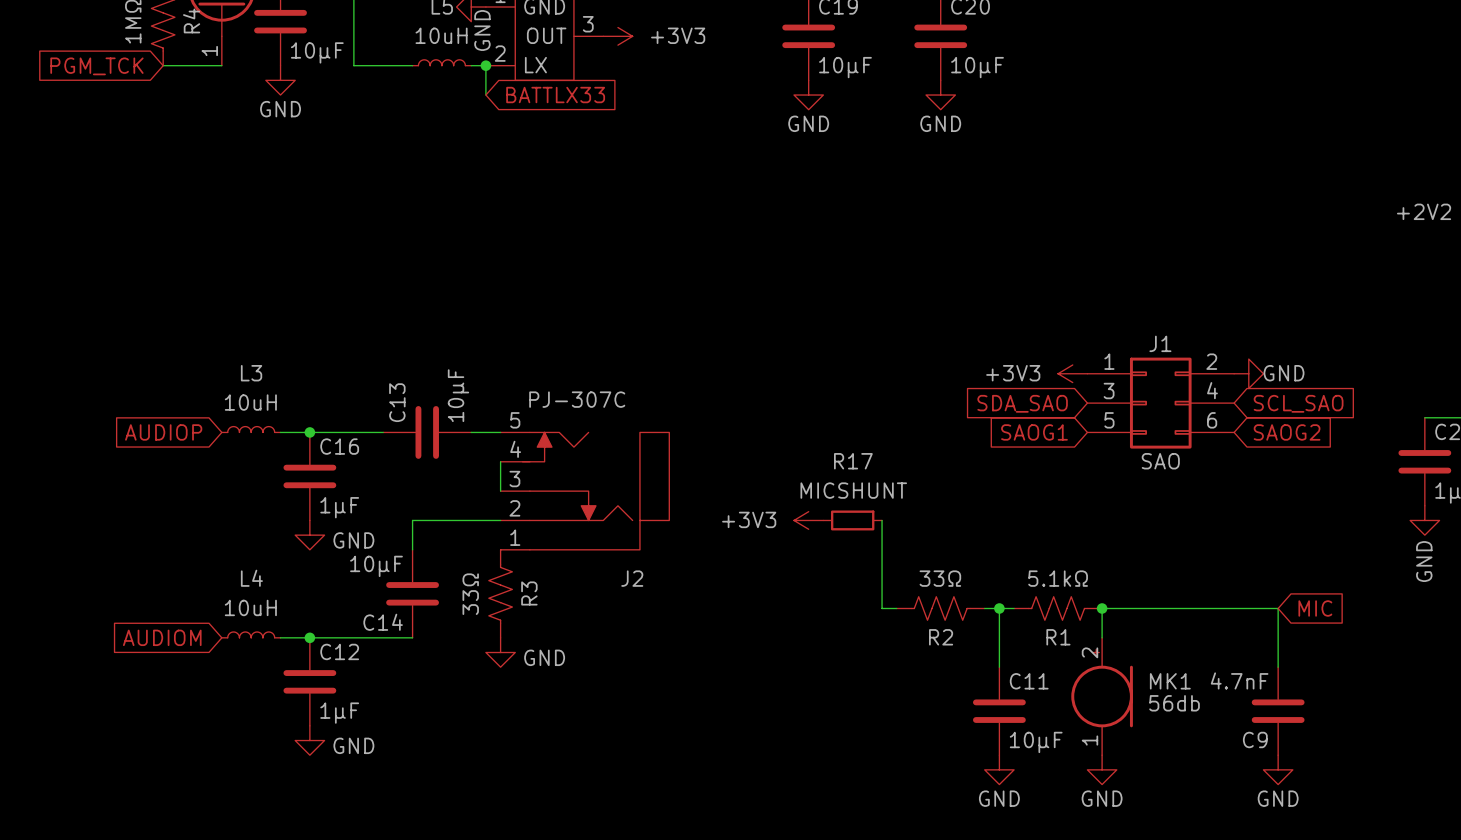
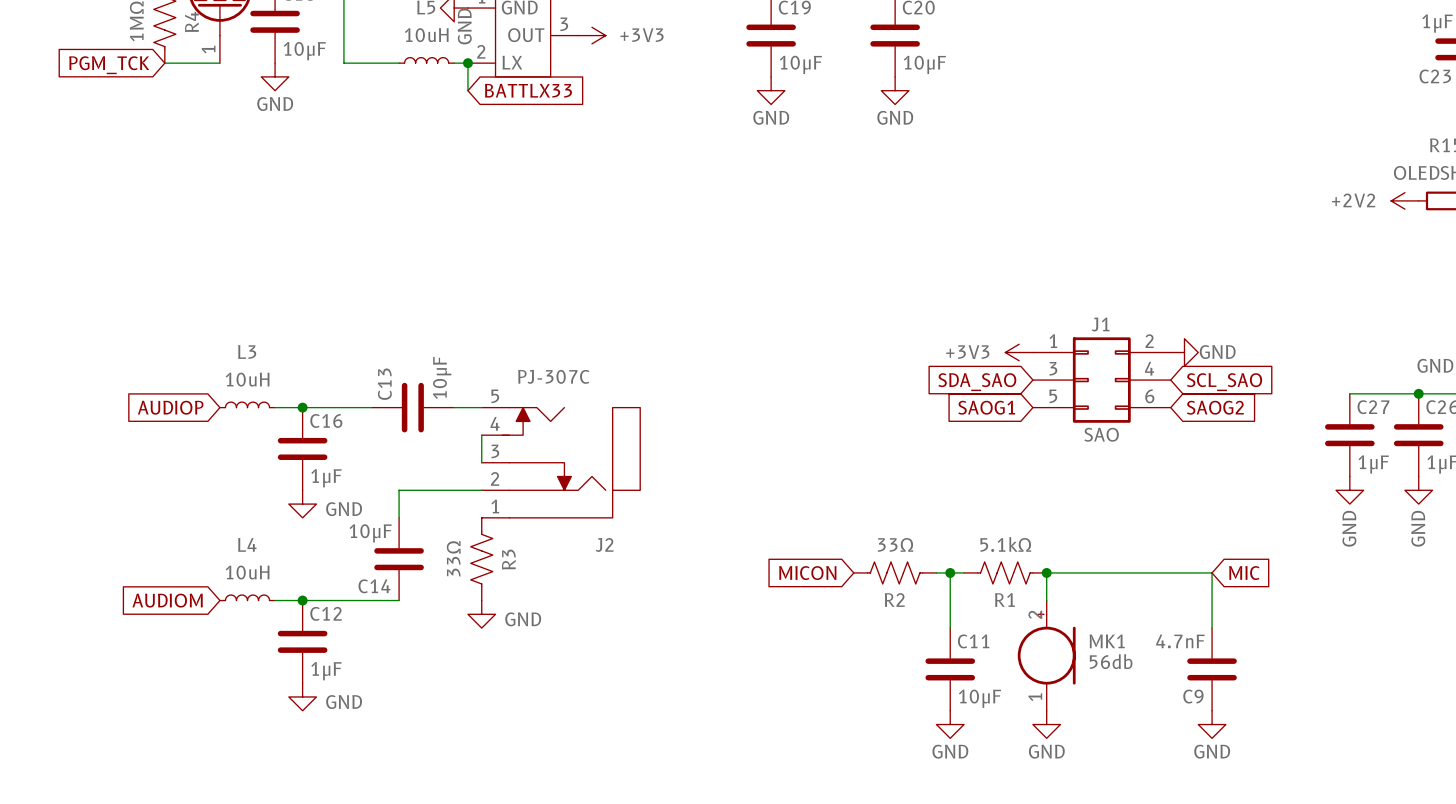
power symbol: +3V3 (808, 520) -> none
R17: MICSHUNT (852, 520) -> none
wire: (882, 520) (882, 608) (896, 608) -> none
global label: none -> MICON (807, 573)

